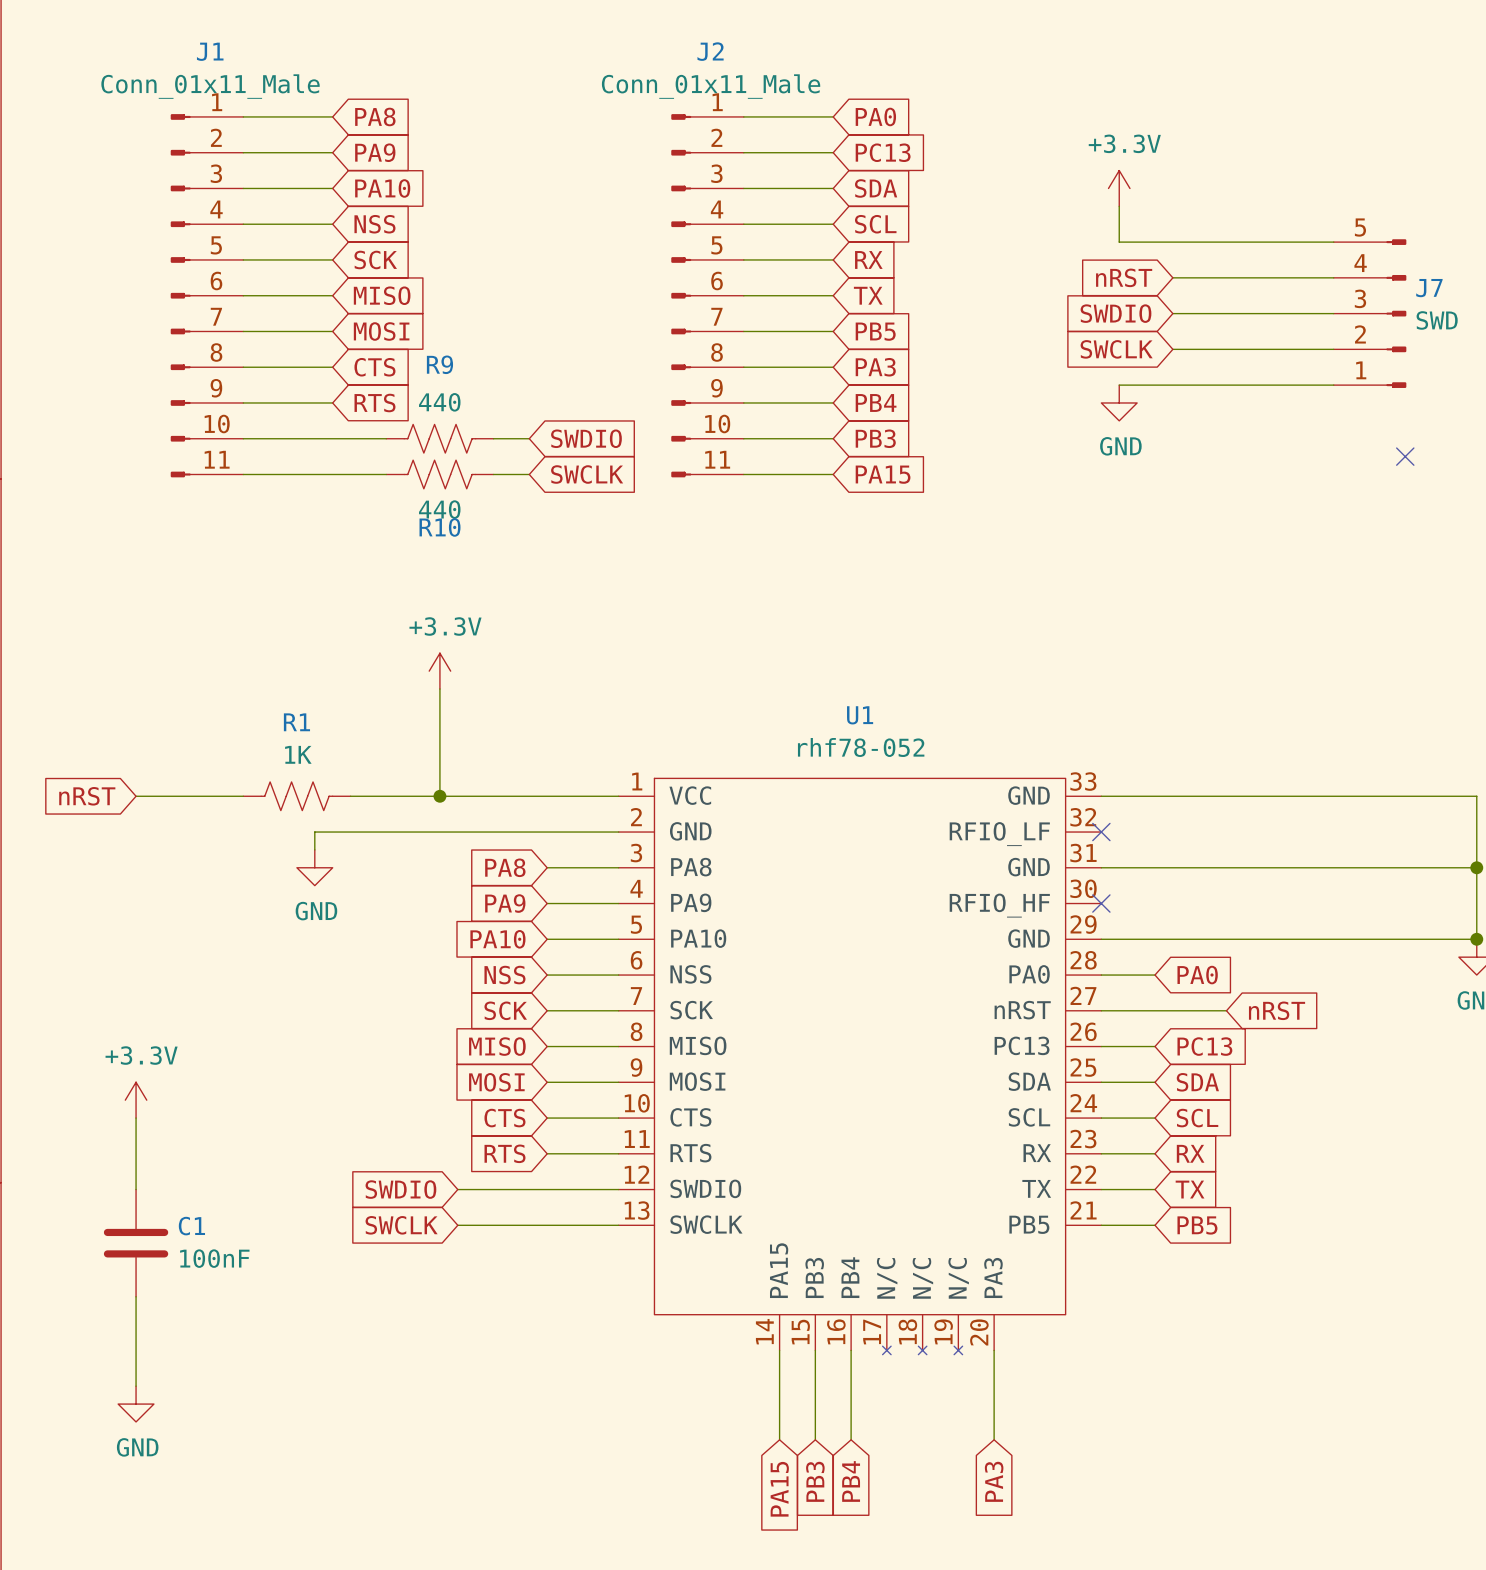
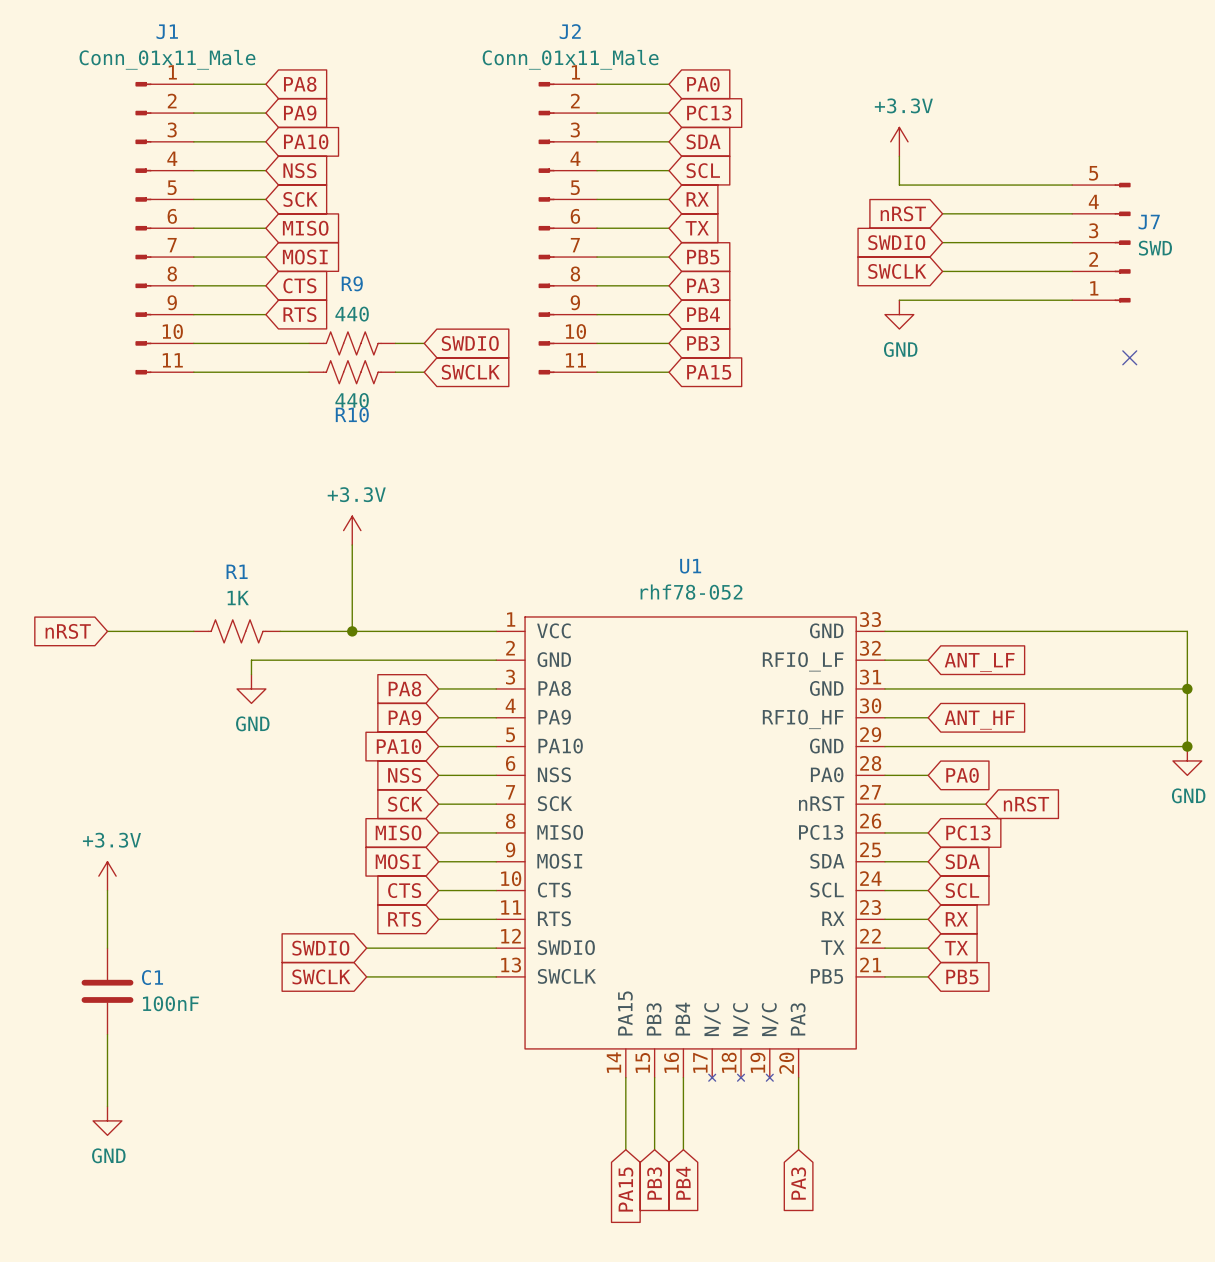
wire: none -> (884, 660) (928, 660)
no-connect mark: (1101, 832) -> none
global label: none -> ANT_LF (979, 662)
wire: none -> (884, 717) (928, 717)
no-connect mark: (1101, 903) -> none
global label: none -> ANT_HF (979, 720)

